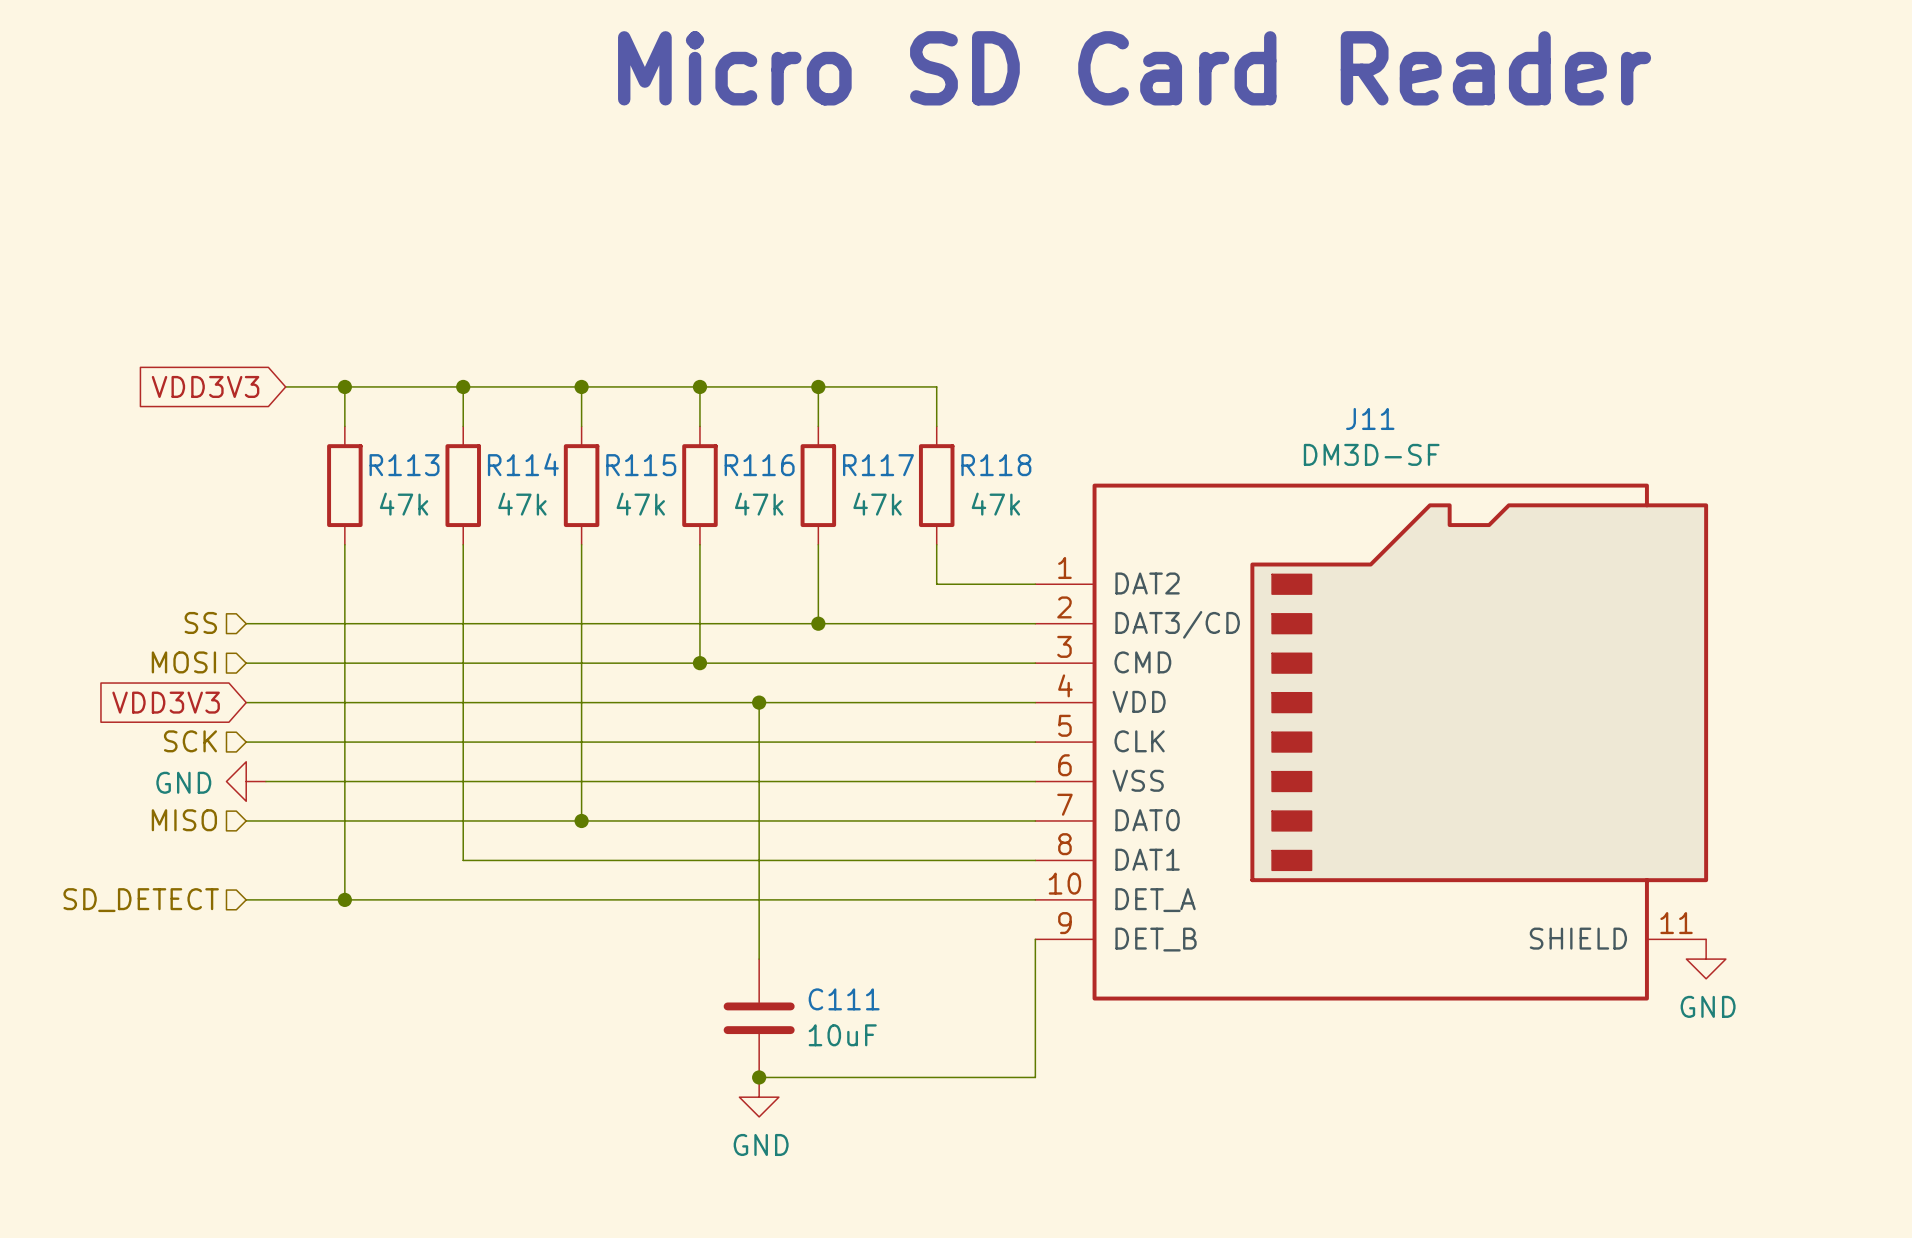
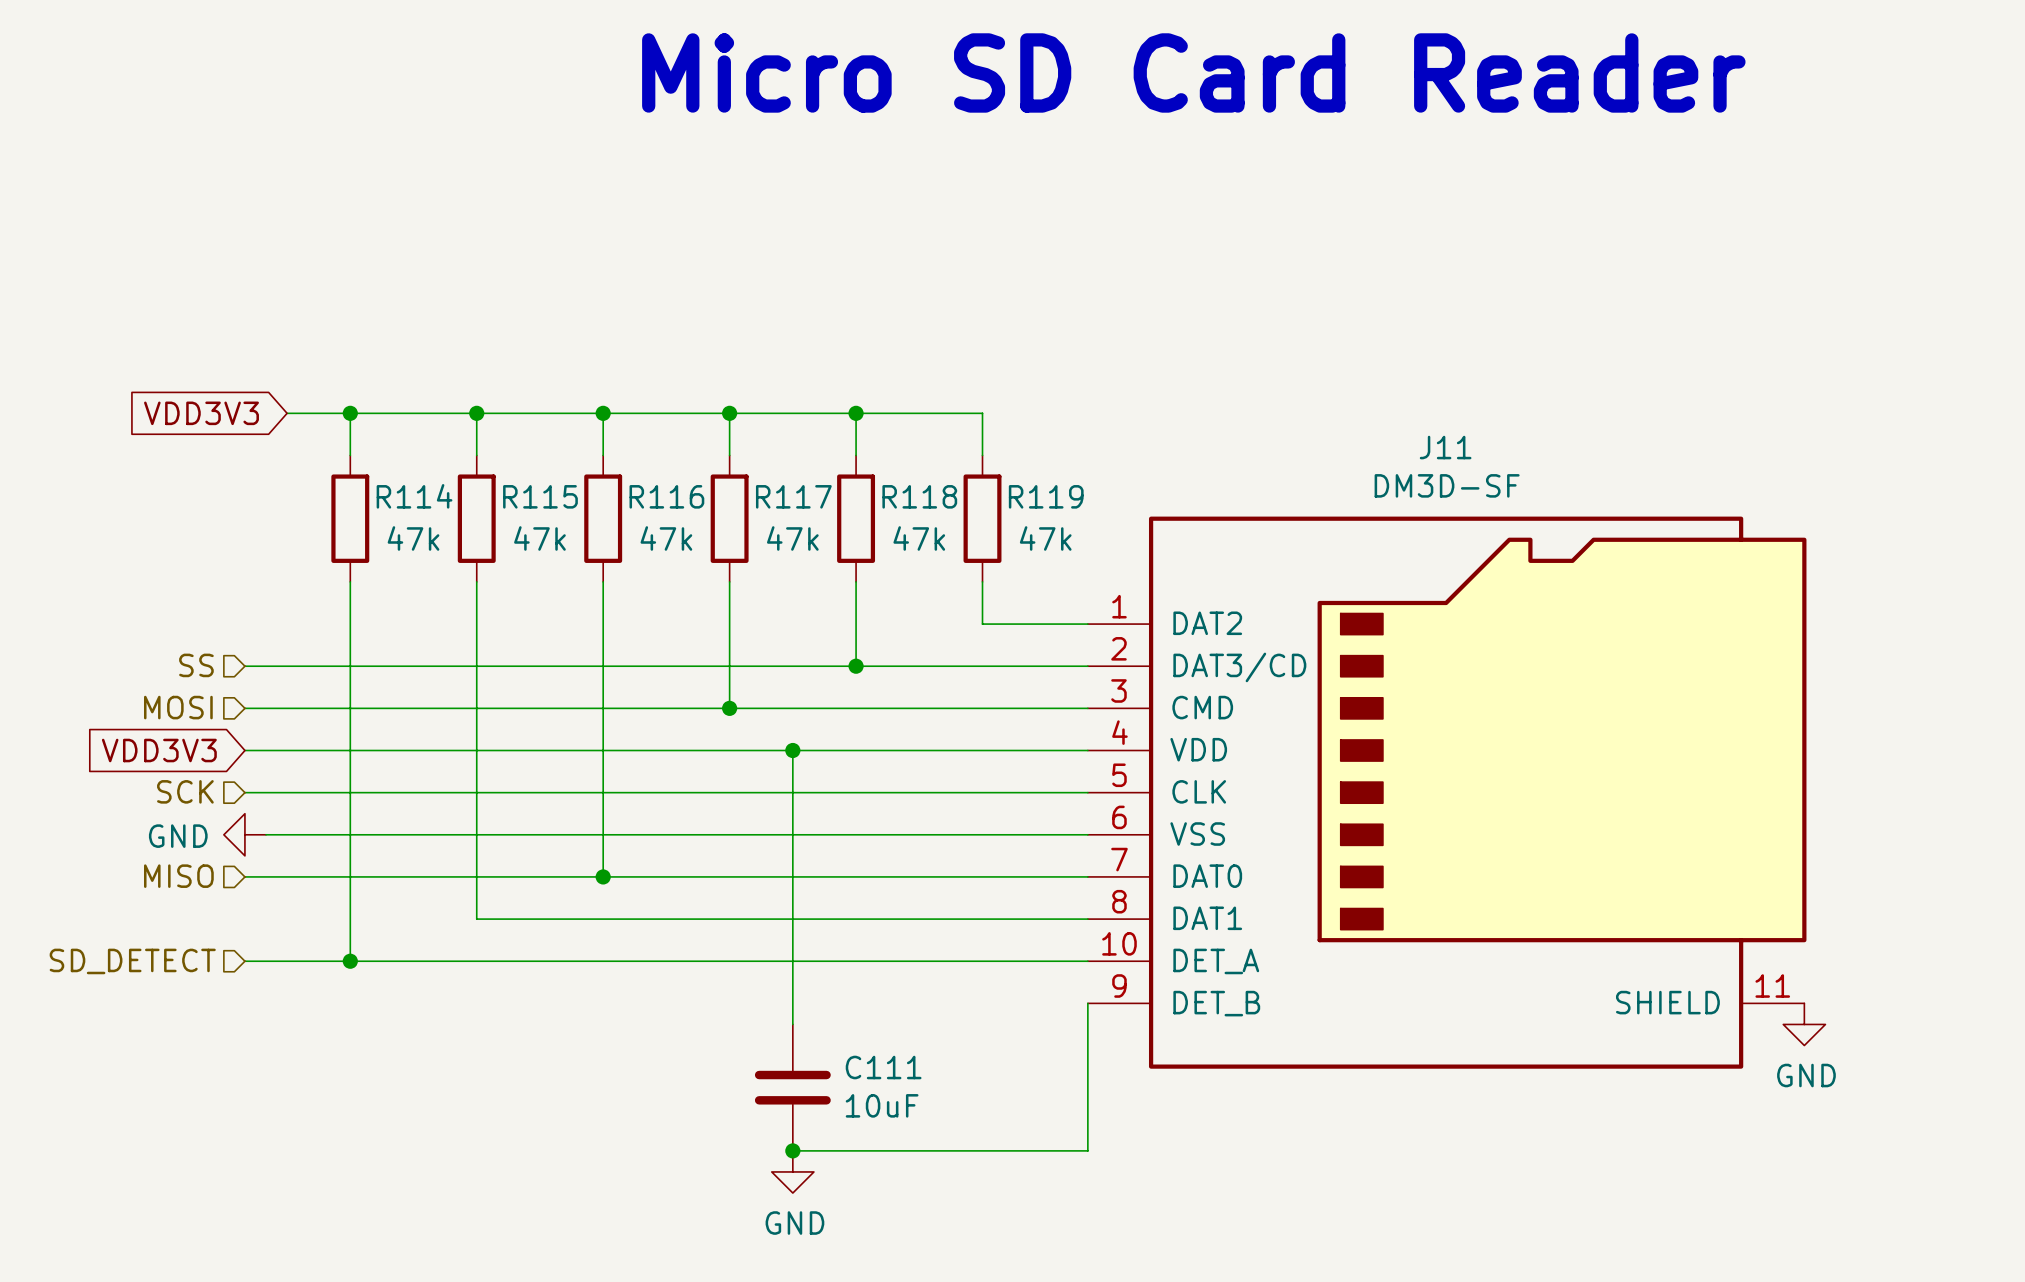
R114 name: R114 (523, 464) -> R115 (540, 496)
R113 name: R113 (404, 465) -> R114 (414, 496)
R115 name: R115 (641, 465) -> R116 (666, 496)
R116 name: R116 (759, 465) -> R117 (793, 496)
R117 name: R117 (878, 465) -> R118 (919, 496)
R118 name: R118 (996, 465) -> R119 (1046, 496)

